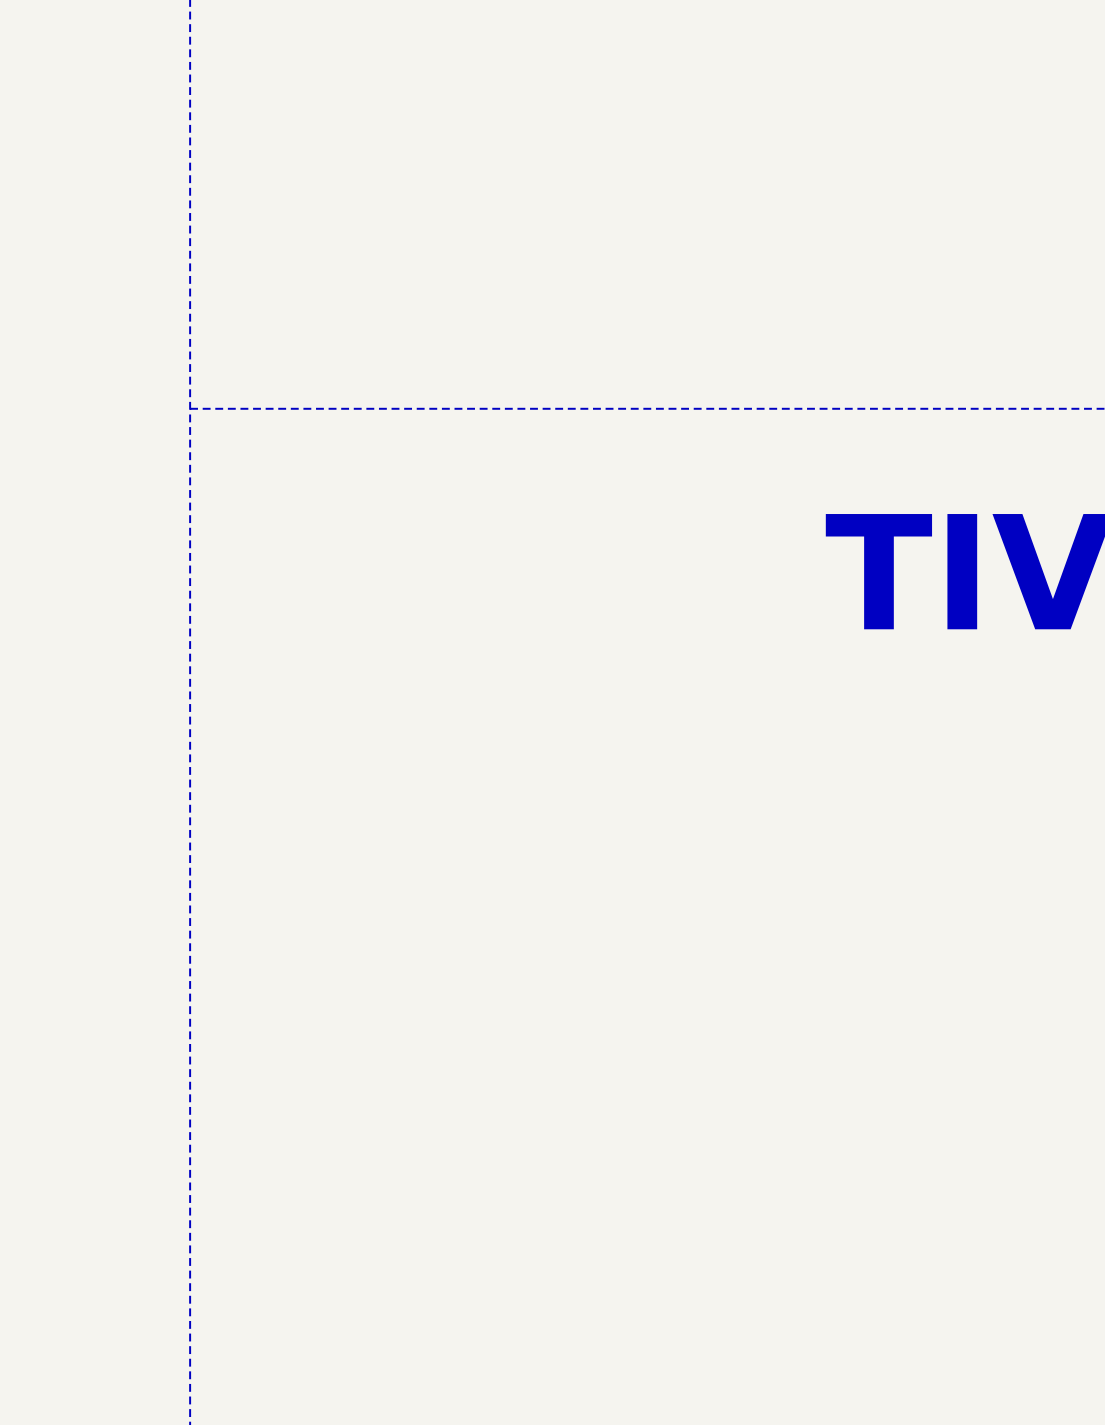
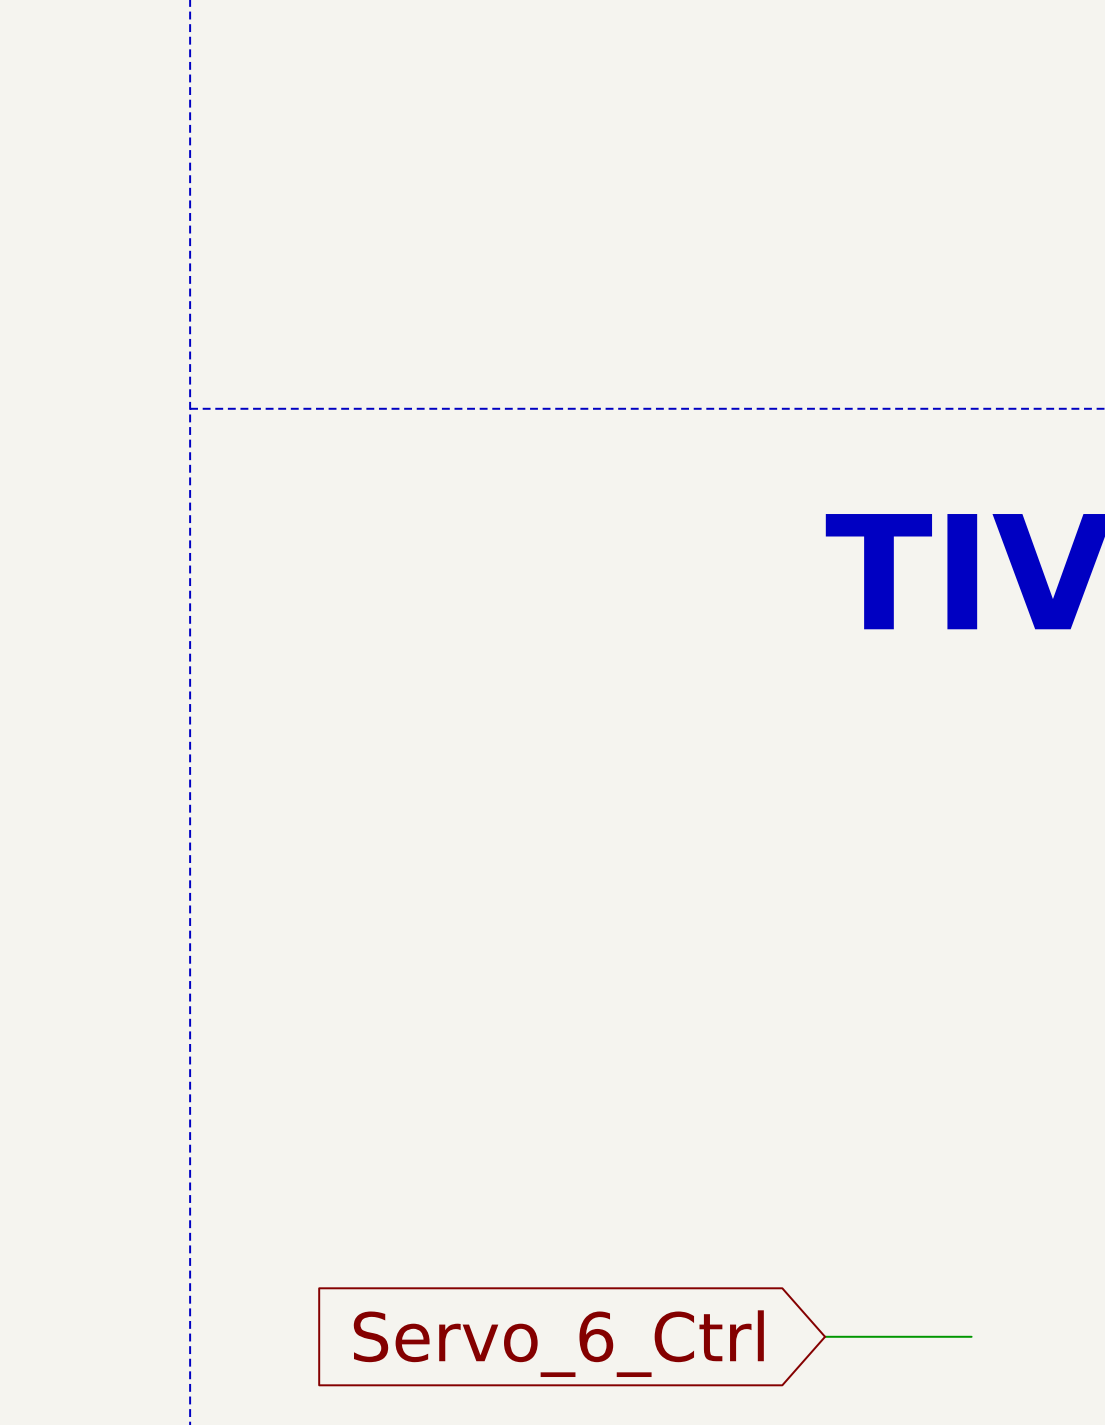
wire: none -> (825, 1336) (971, 1336)
global label: none -> Servo_6_Ctrl (558, 1343)

